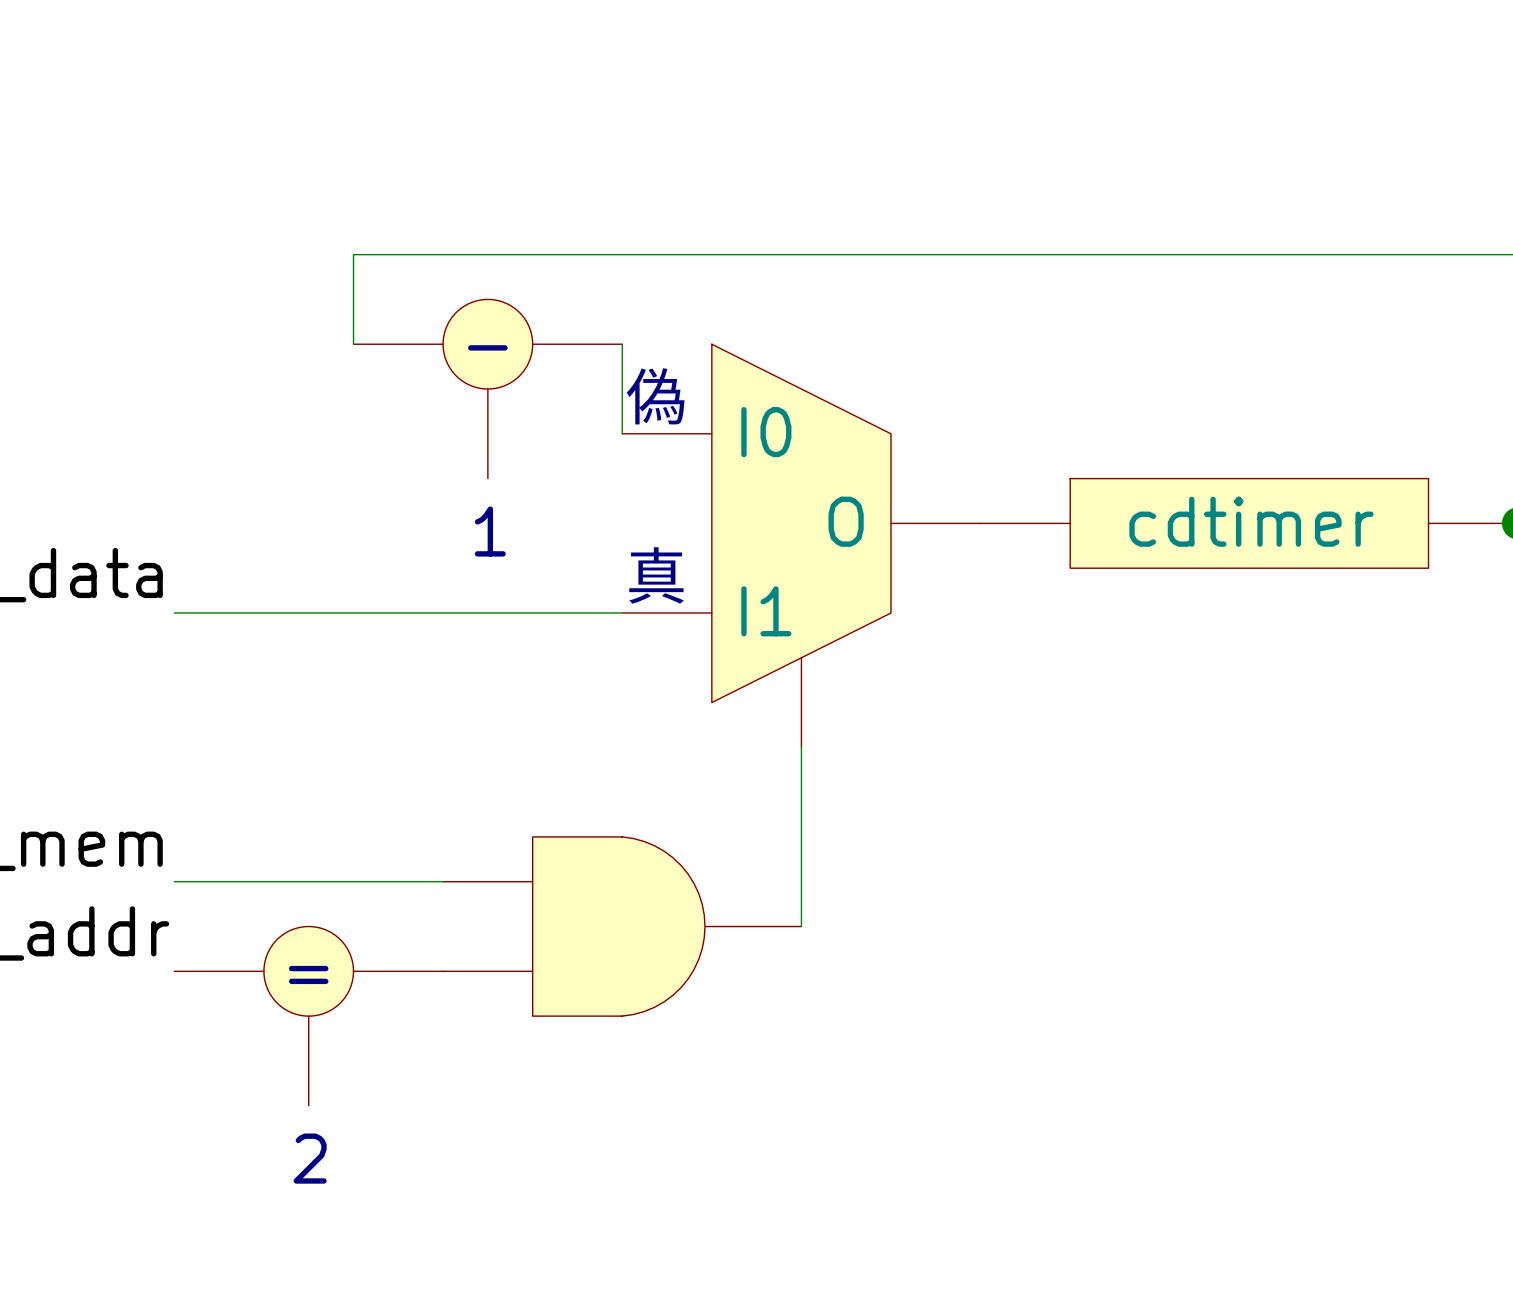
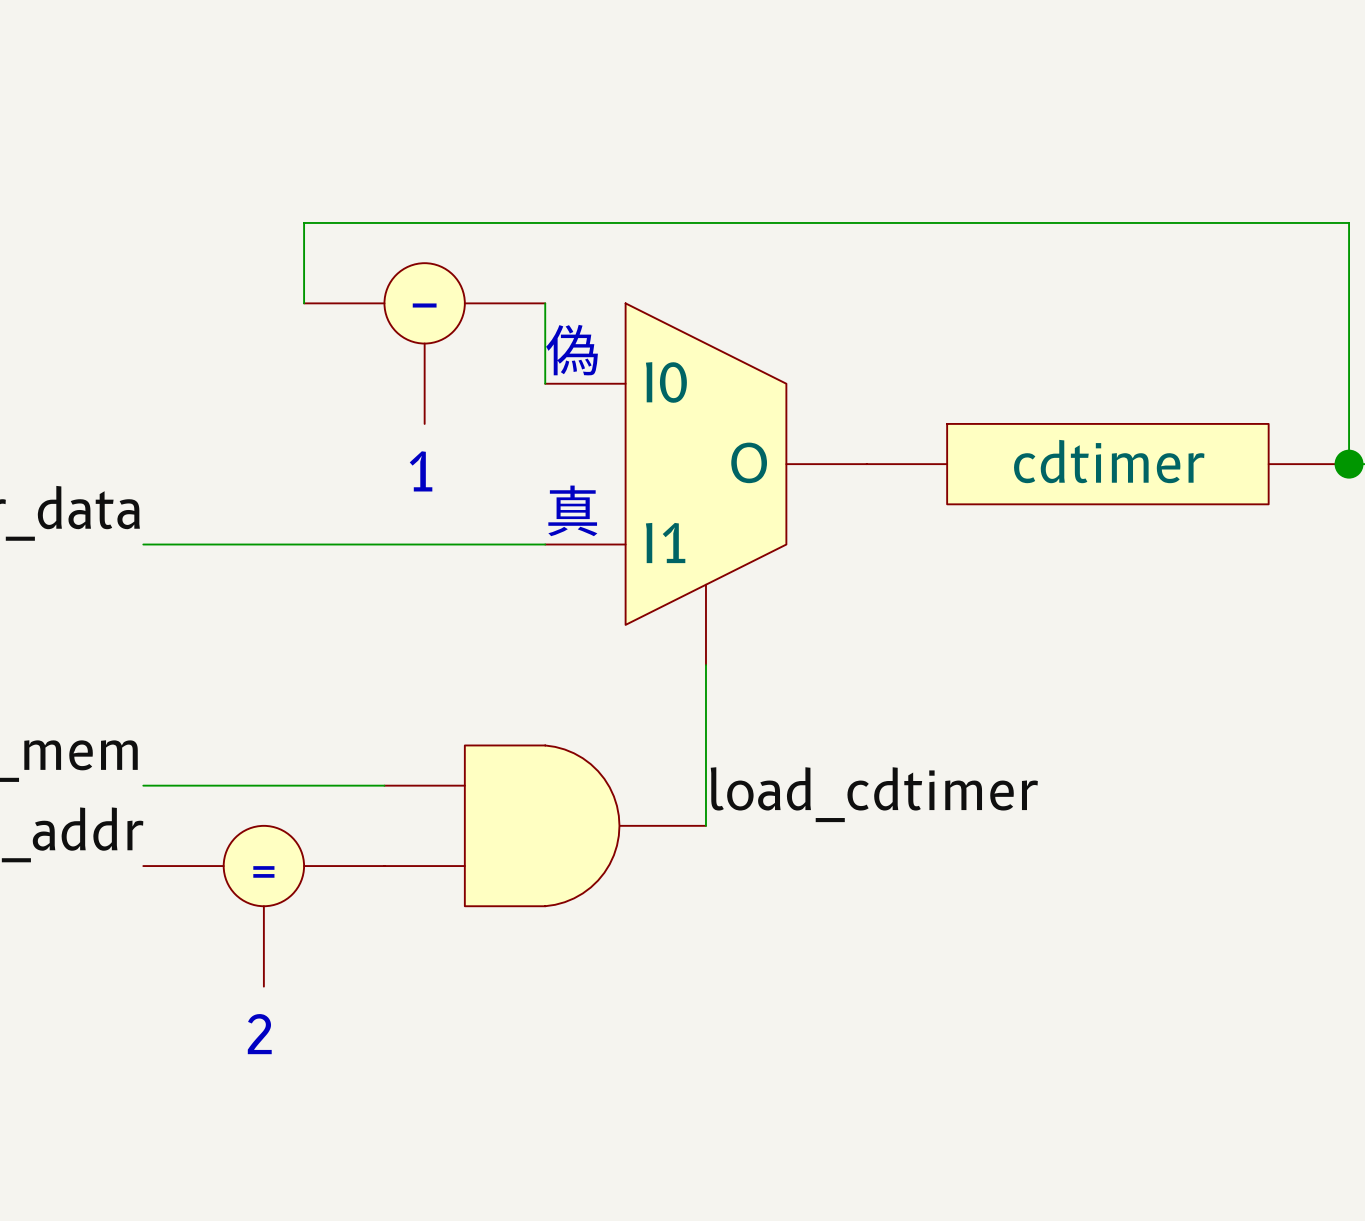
label: none -> load_cdtimer (874, 794)

